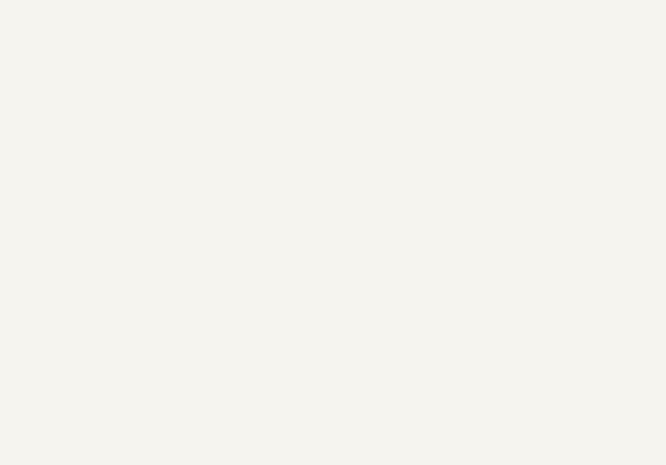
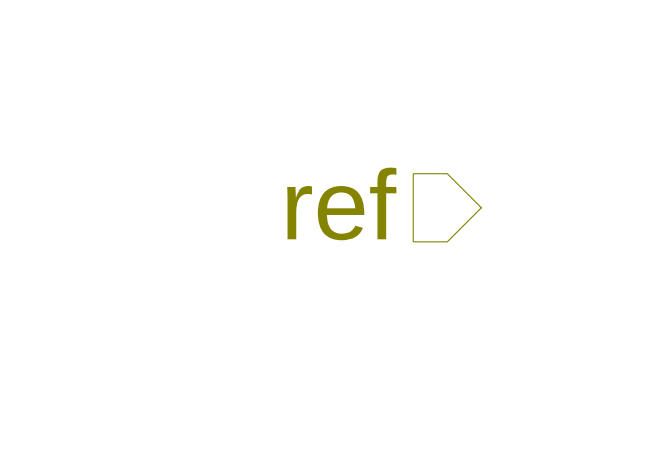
hierarchical label: none -> ref (341, 203)

